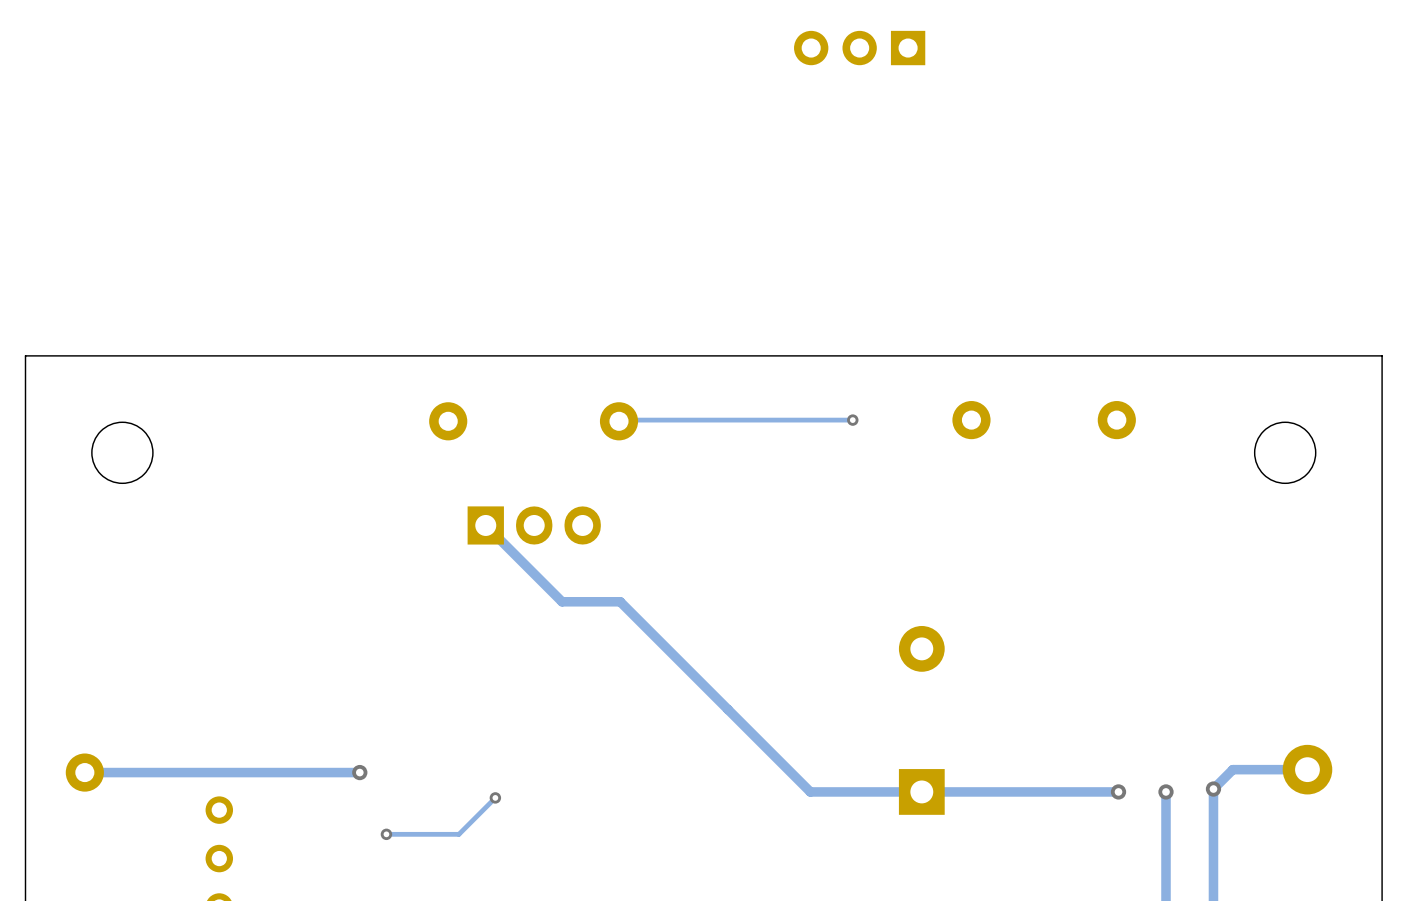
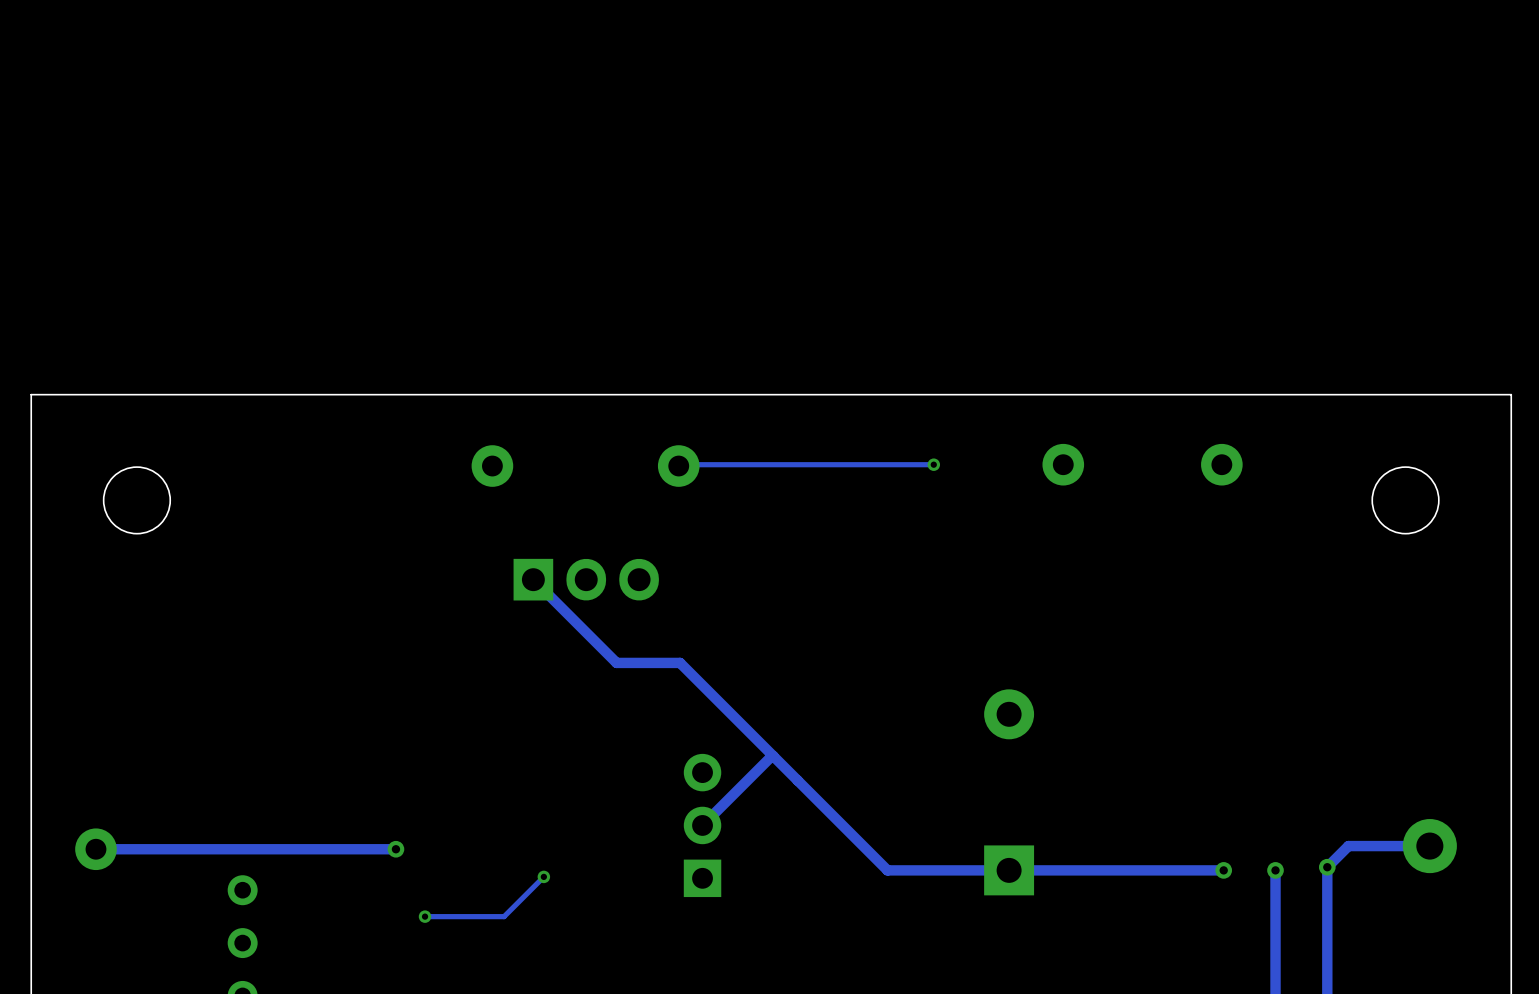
part: (859, 48) -> none
track: none -> (773, 756) (702, 825)
part: none -> (702, 825)

